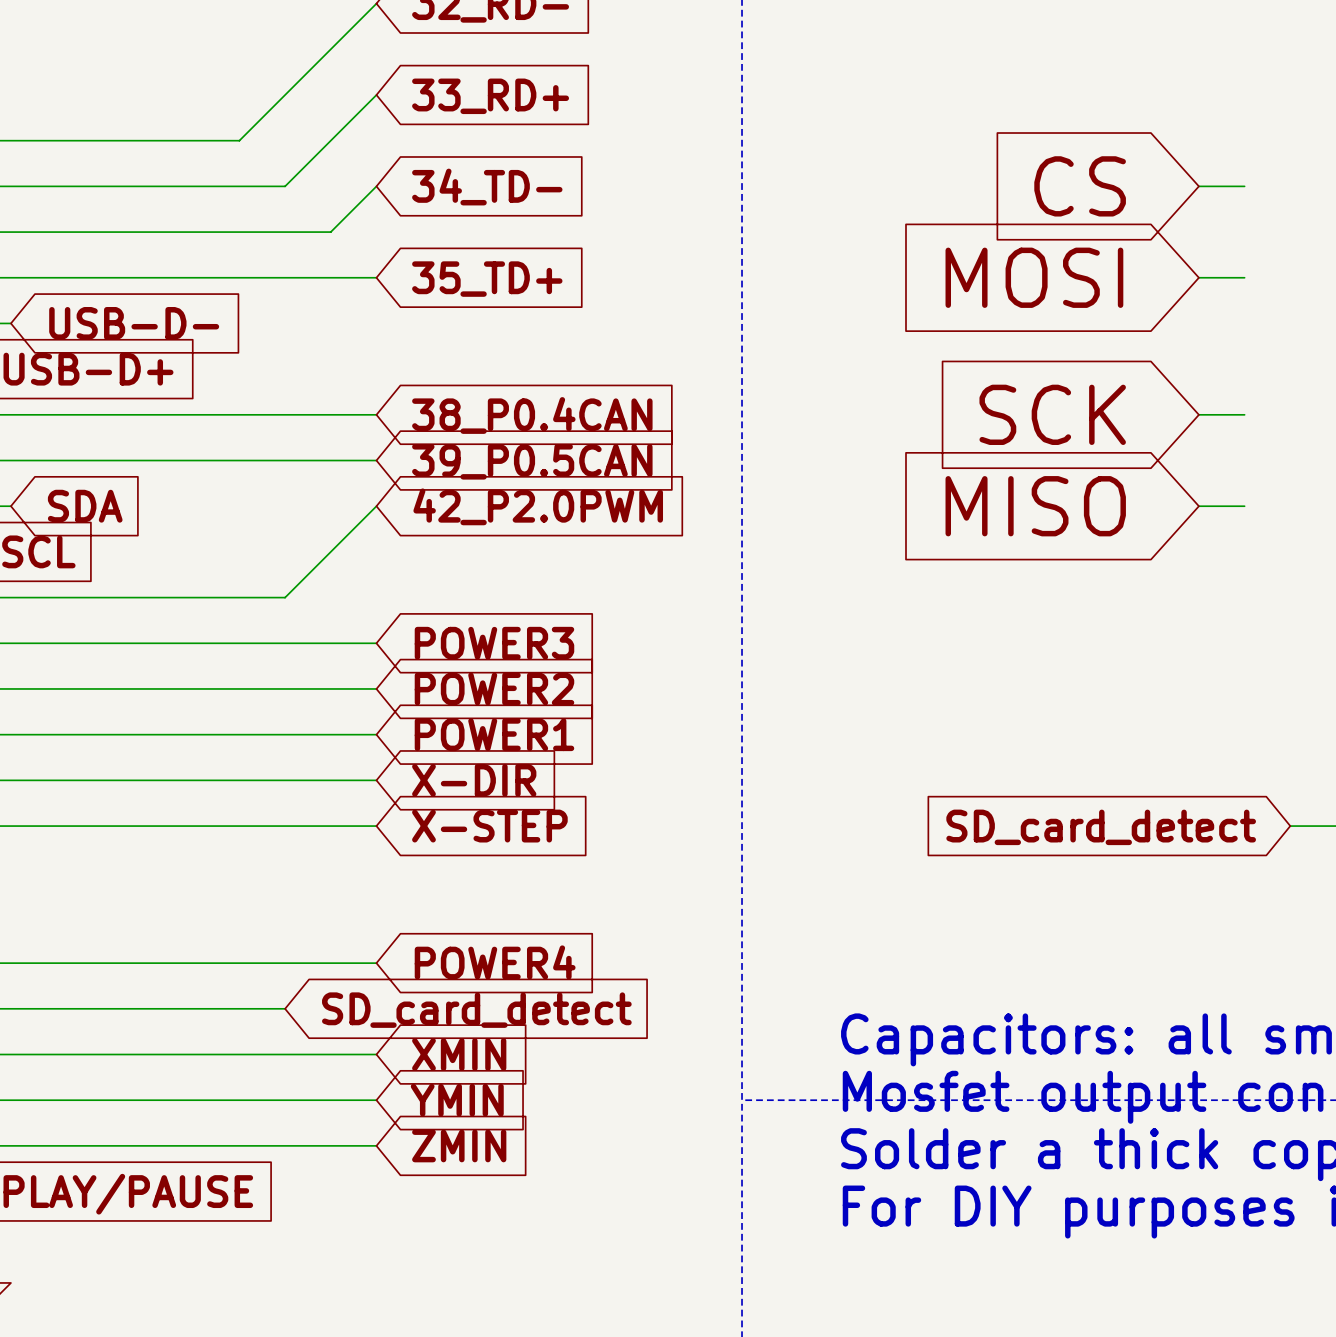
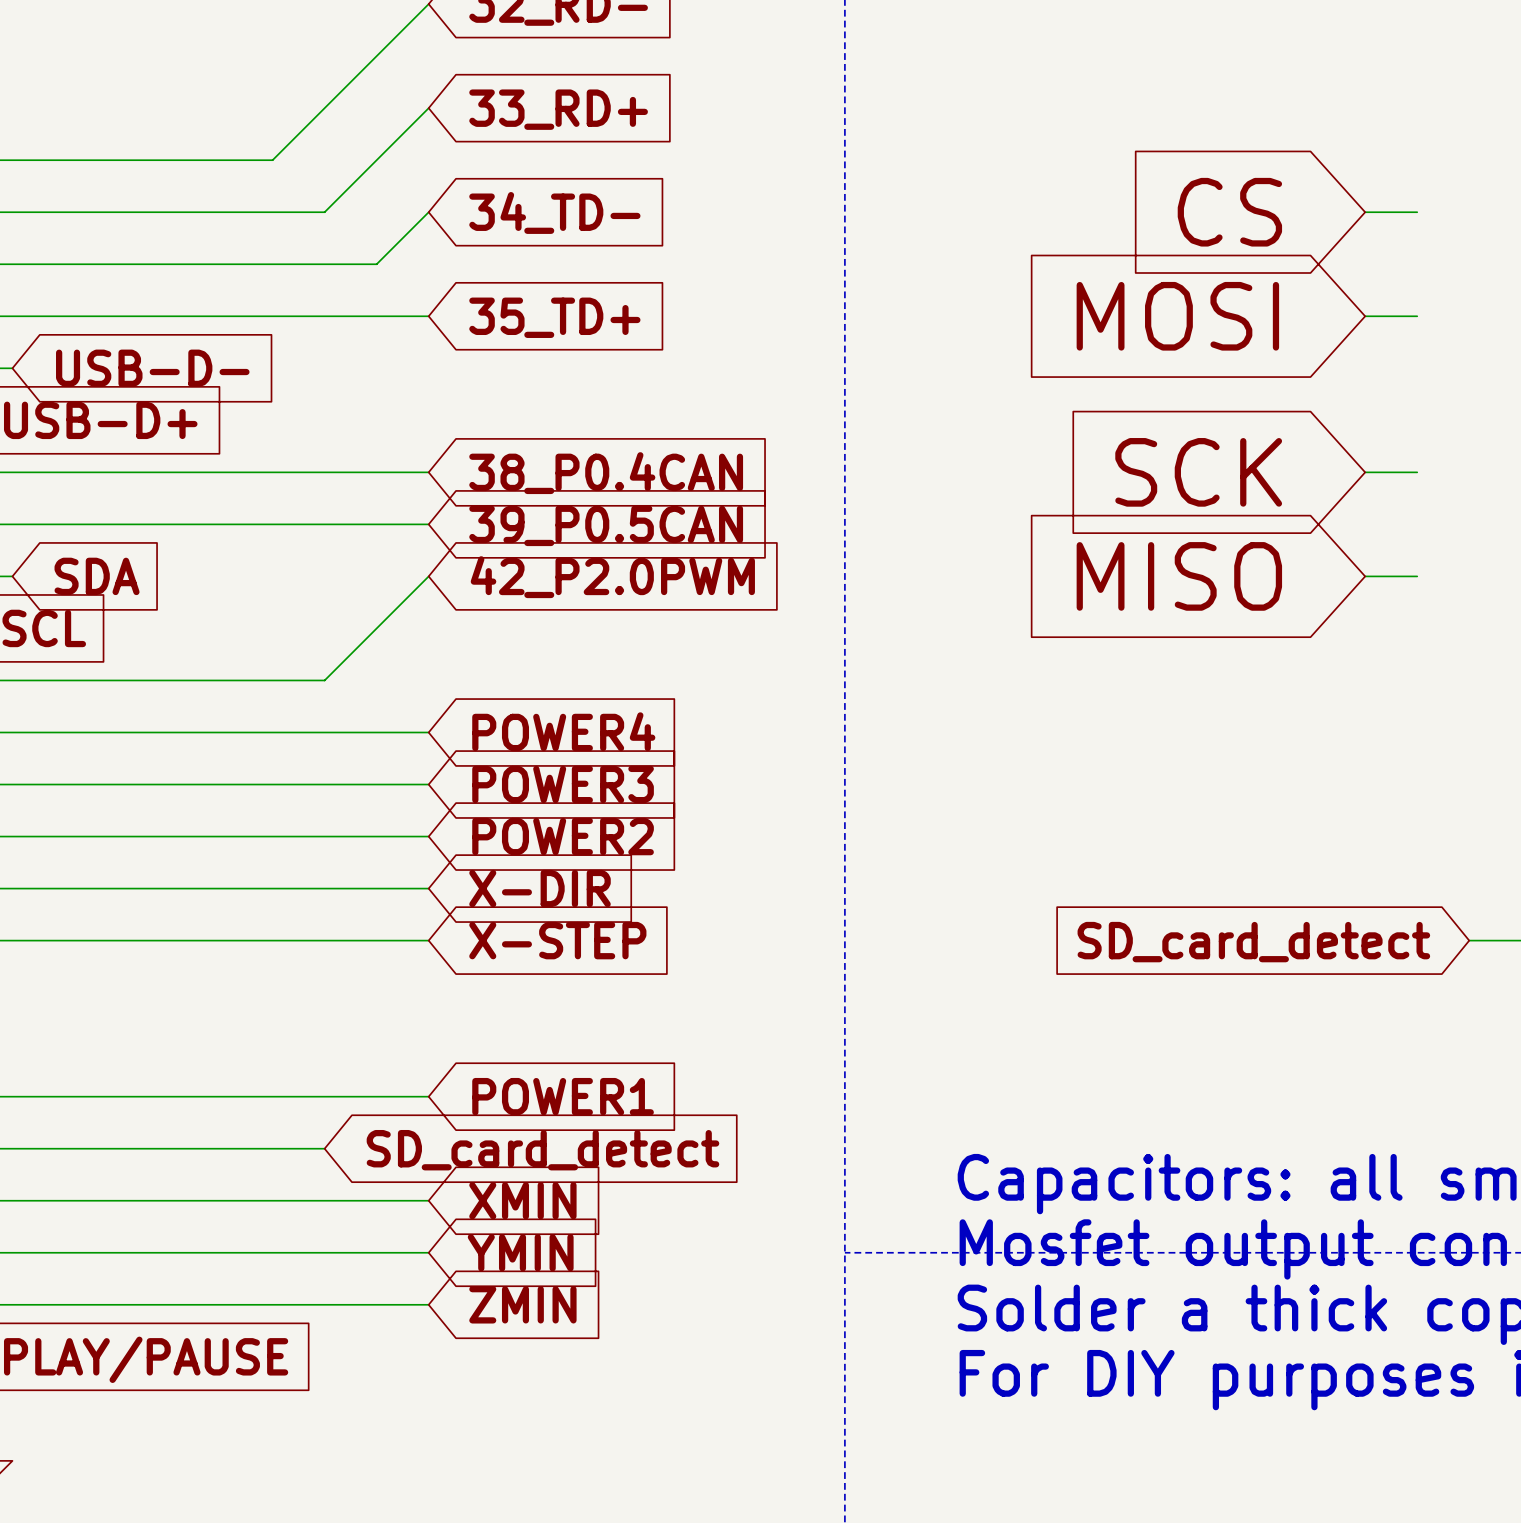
global label: POWER3 (494, 643) -> POWER4 (563, 731)
global label: POWER2 (494, 688) -> POWER3 (563, 784)
global label: POWER1 (494, 734) -> POWER2 (563, 836)
global label: POWER4 (495, 962) -> POWER1 (563, 1096)

